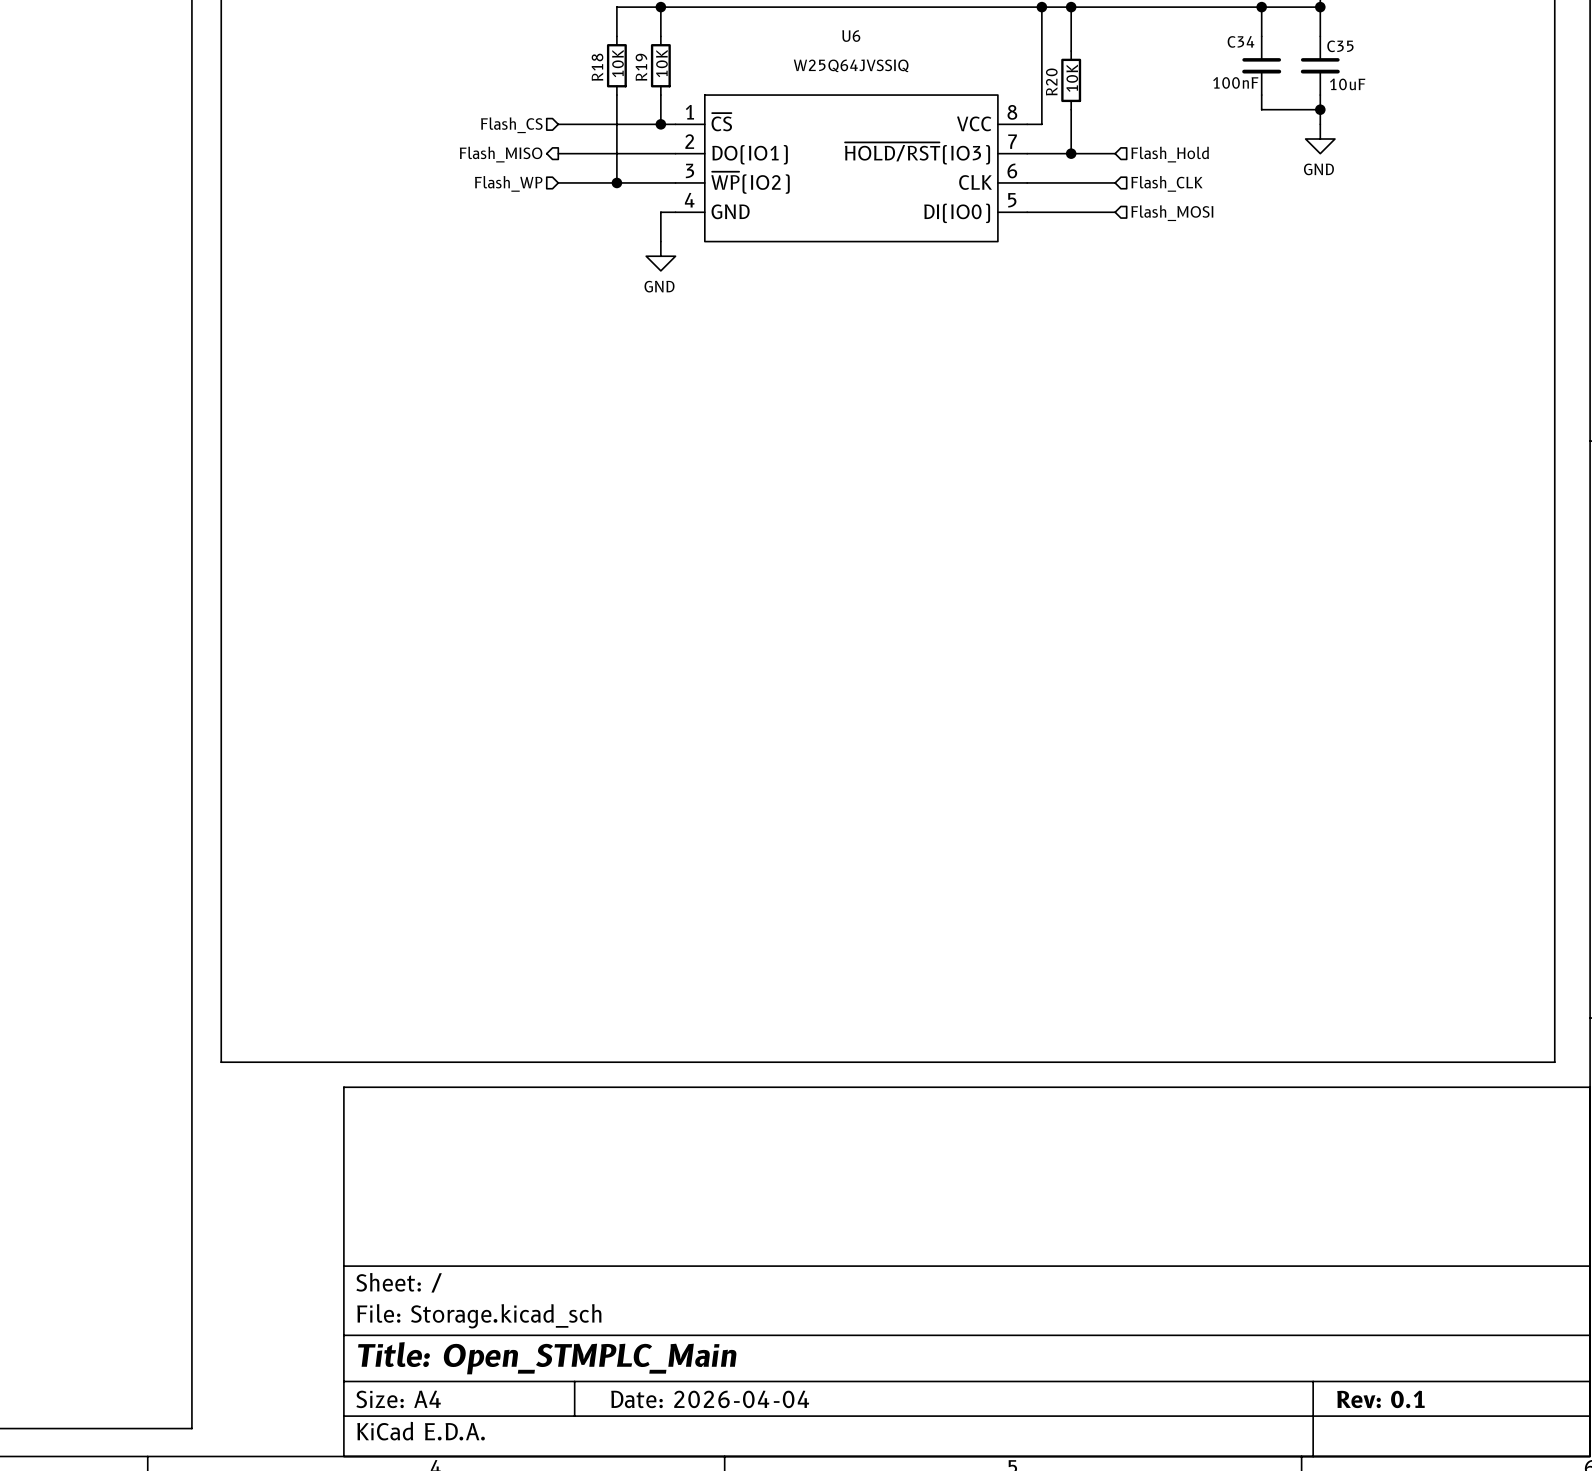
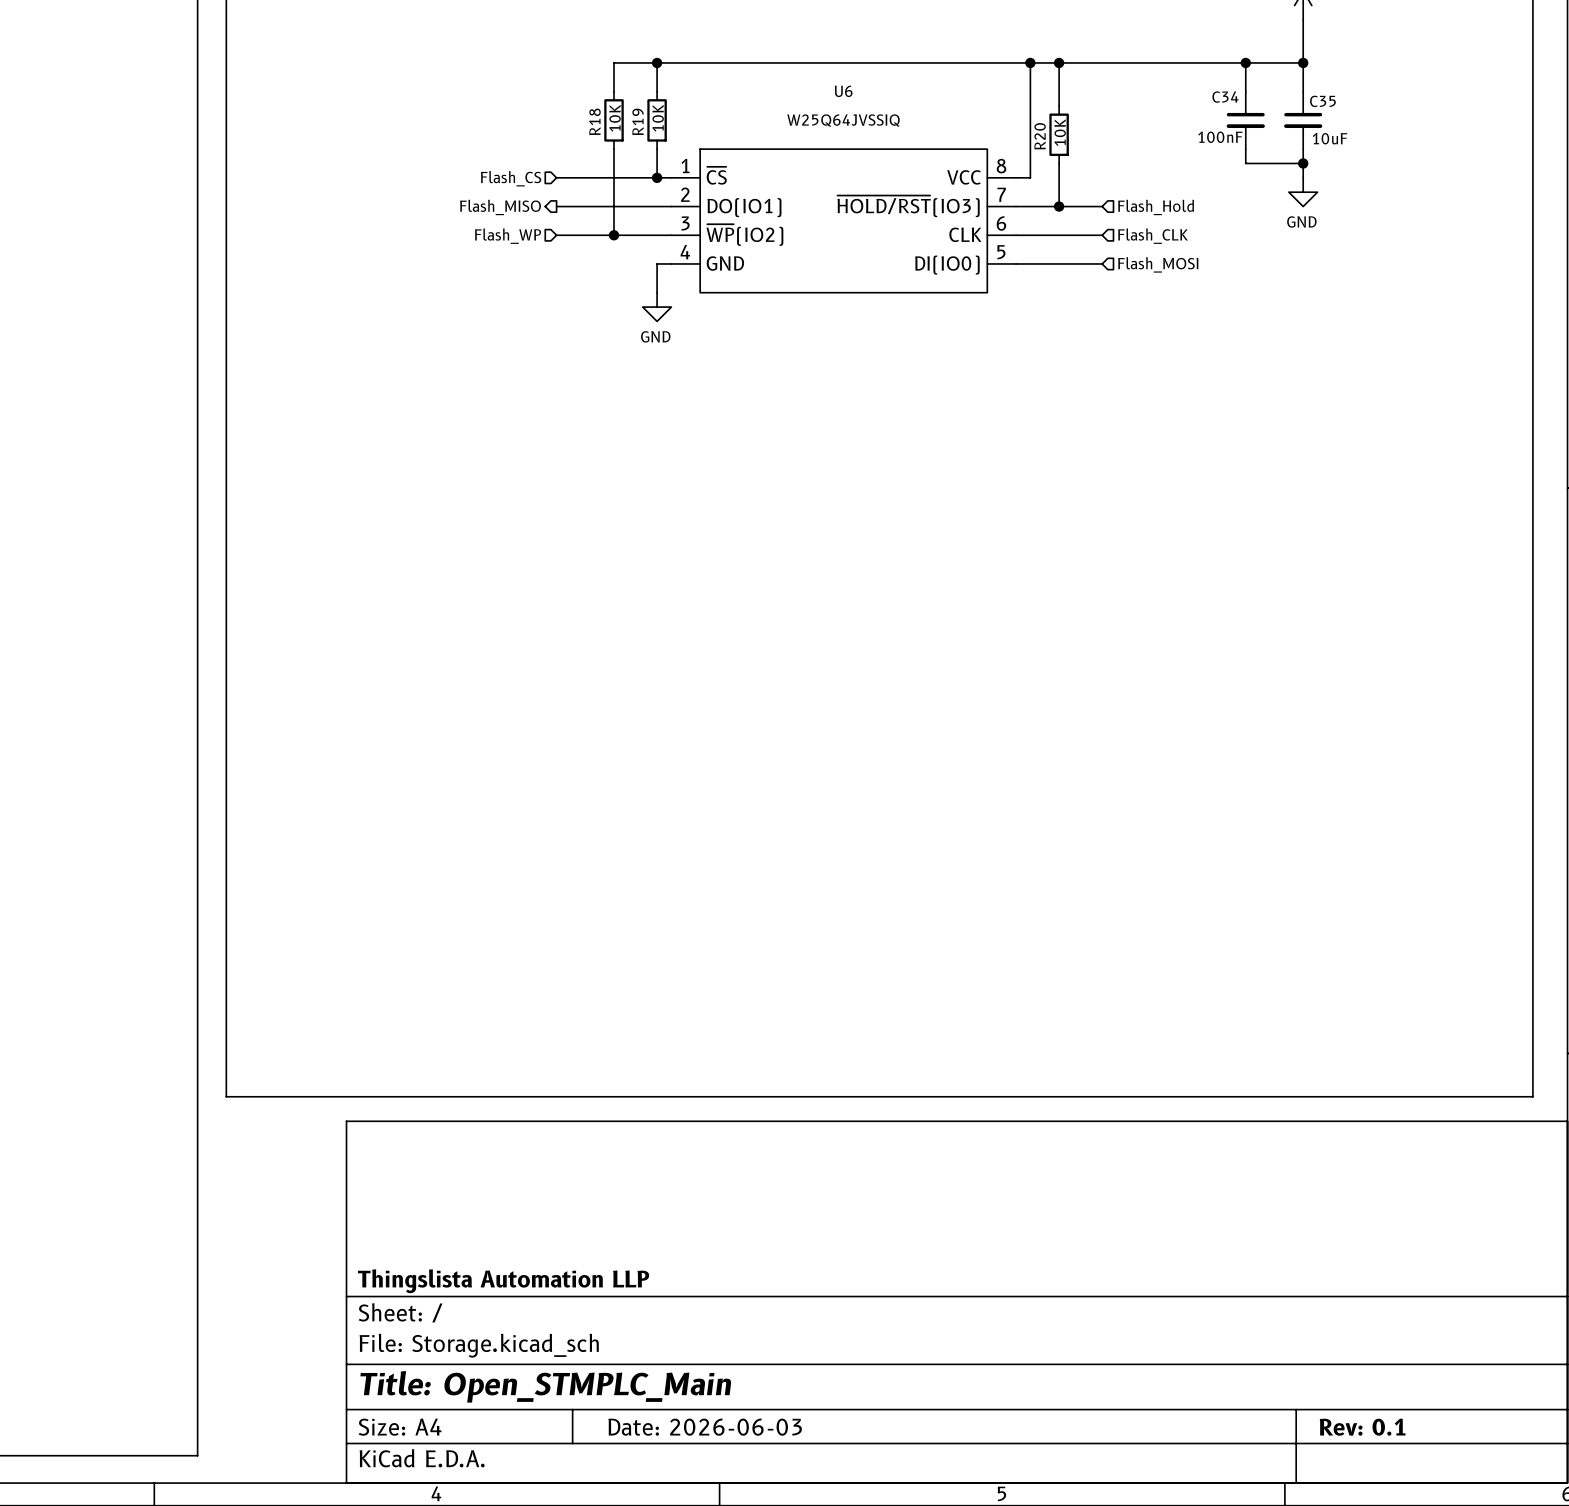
title block: none -> Thingslista Automation LLP (503, 1281)
title block: Date: 2026-04-04 (710, 1399) -> Date: 2026-06-03 (705, 1427)

